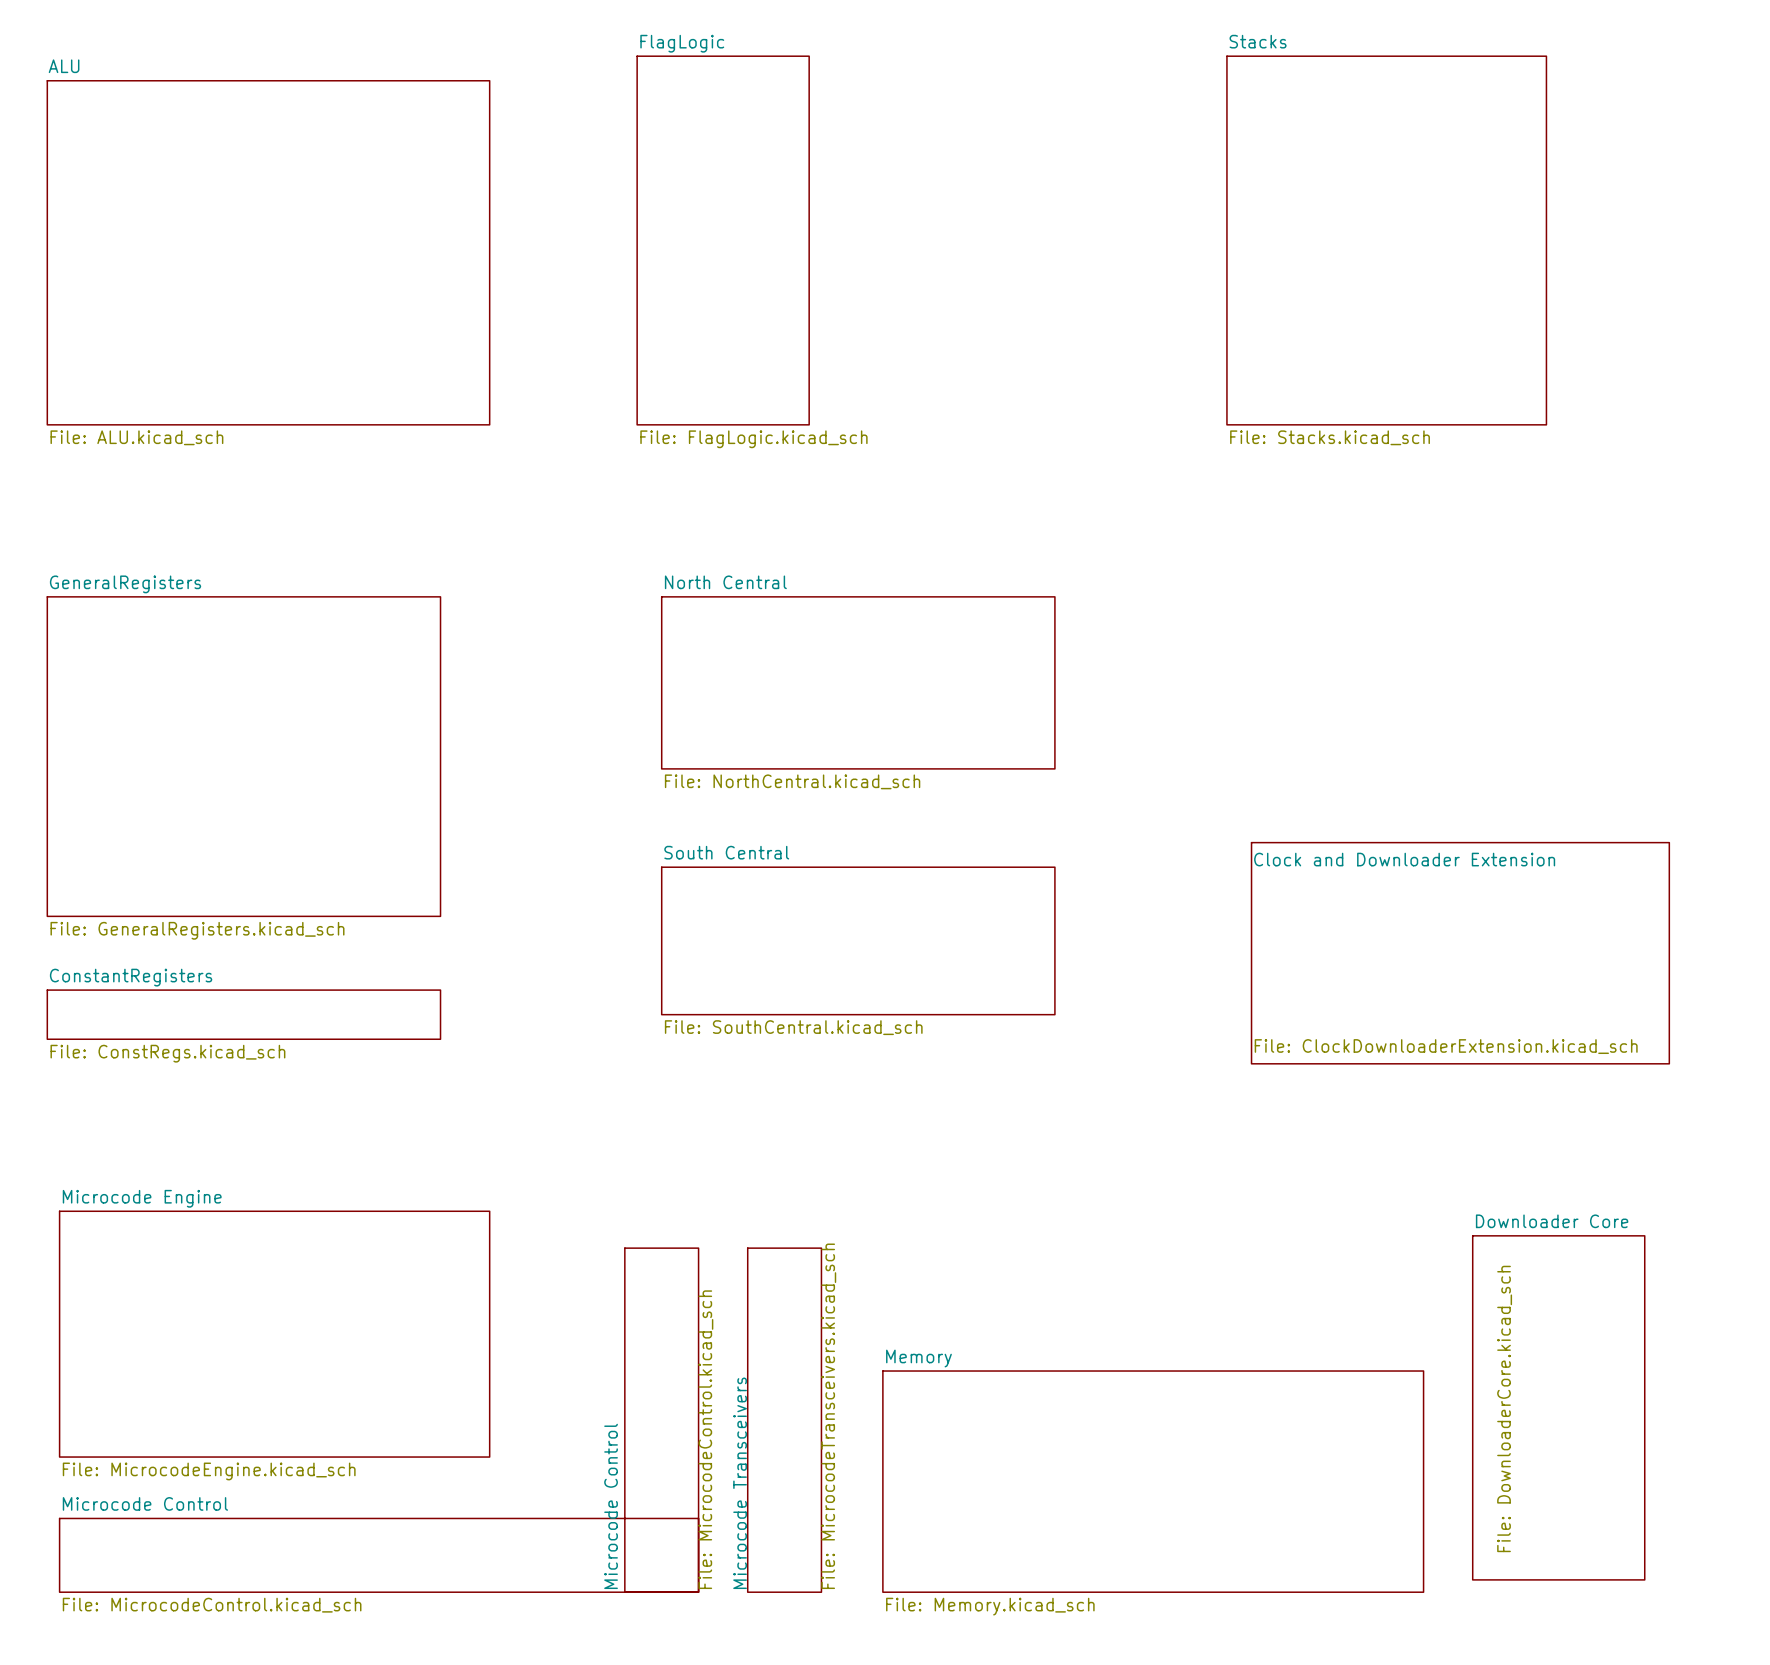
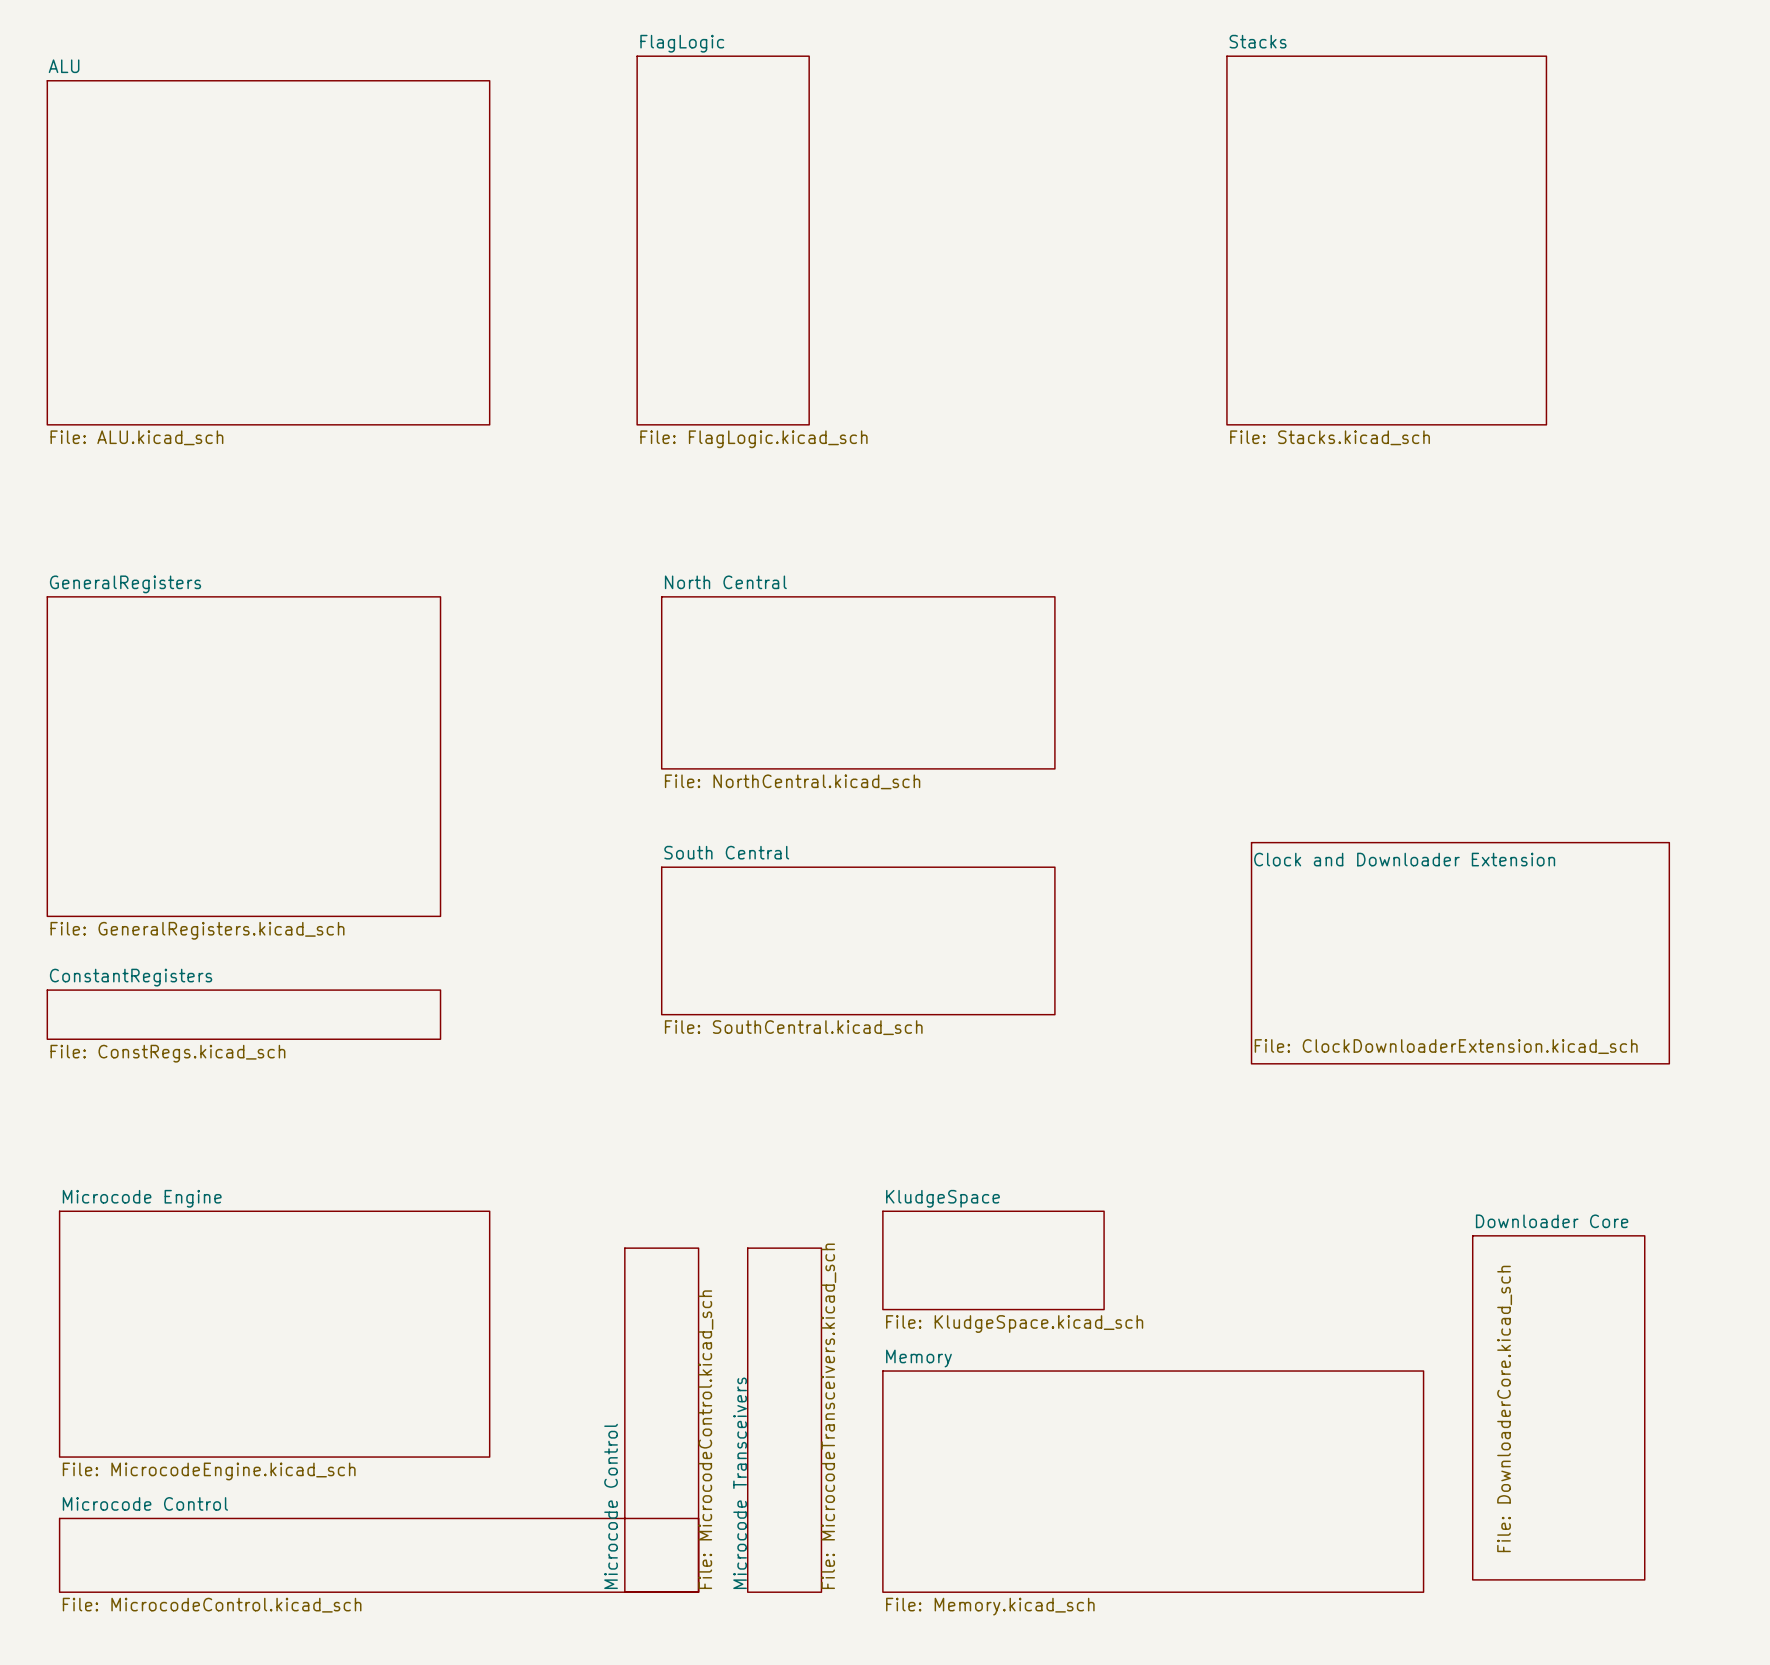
sheet KludgeSpace: none -> File: KludgeSpace.kicad_sch (993, 1260)

